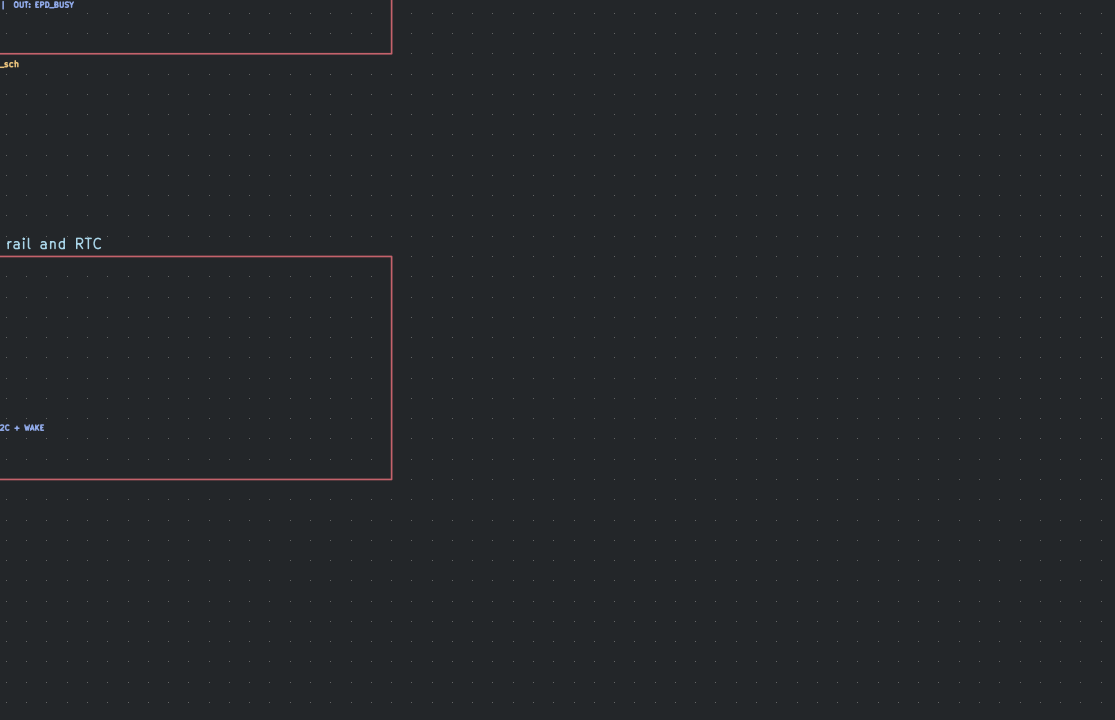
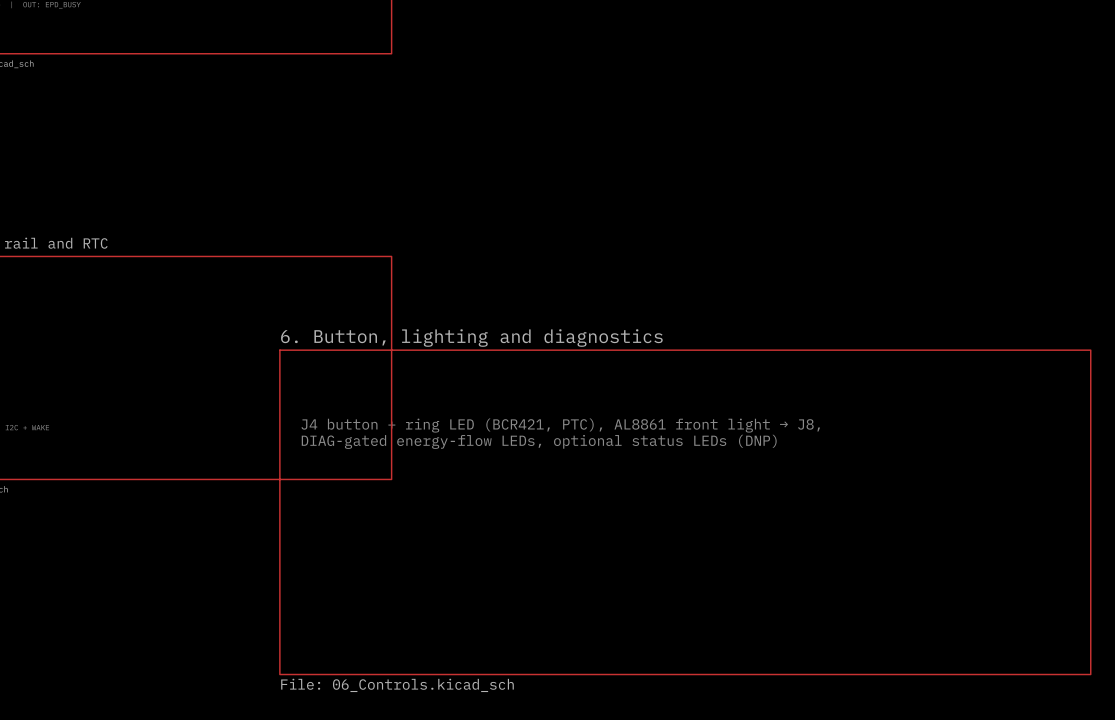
text: none -> J4 button + ring LED (BCR421, PTC), AL8861 front light → J8, (560, 425)
text: none -> DIAG-gated energy-flow LEDs, optional status LEDs (DNP) (539, 441)
sheet 6. Button, lighting and diagnostics: none -> File: 06_Controls.kicad_sch (685, 512)

